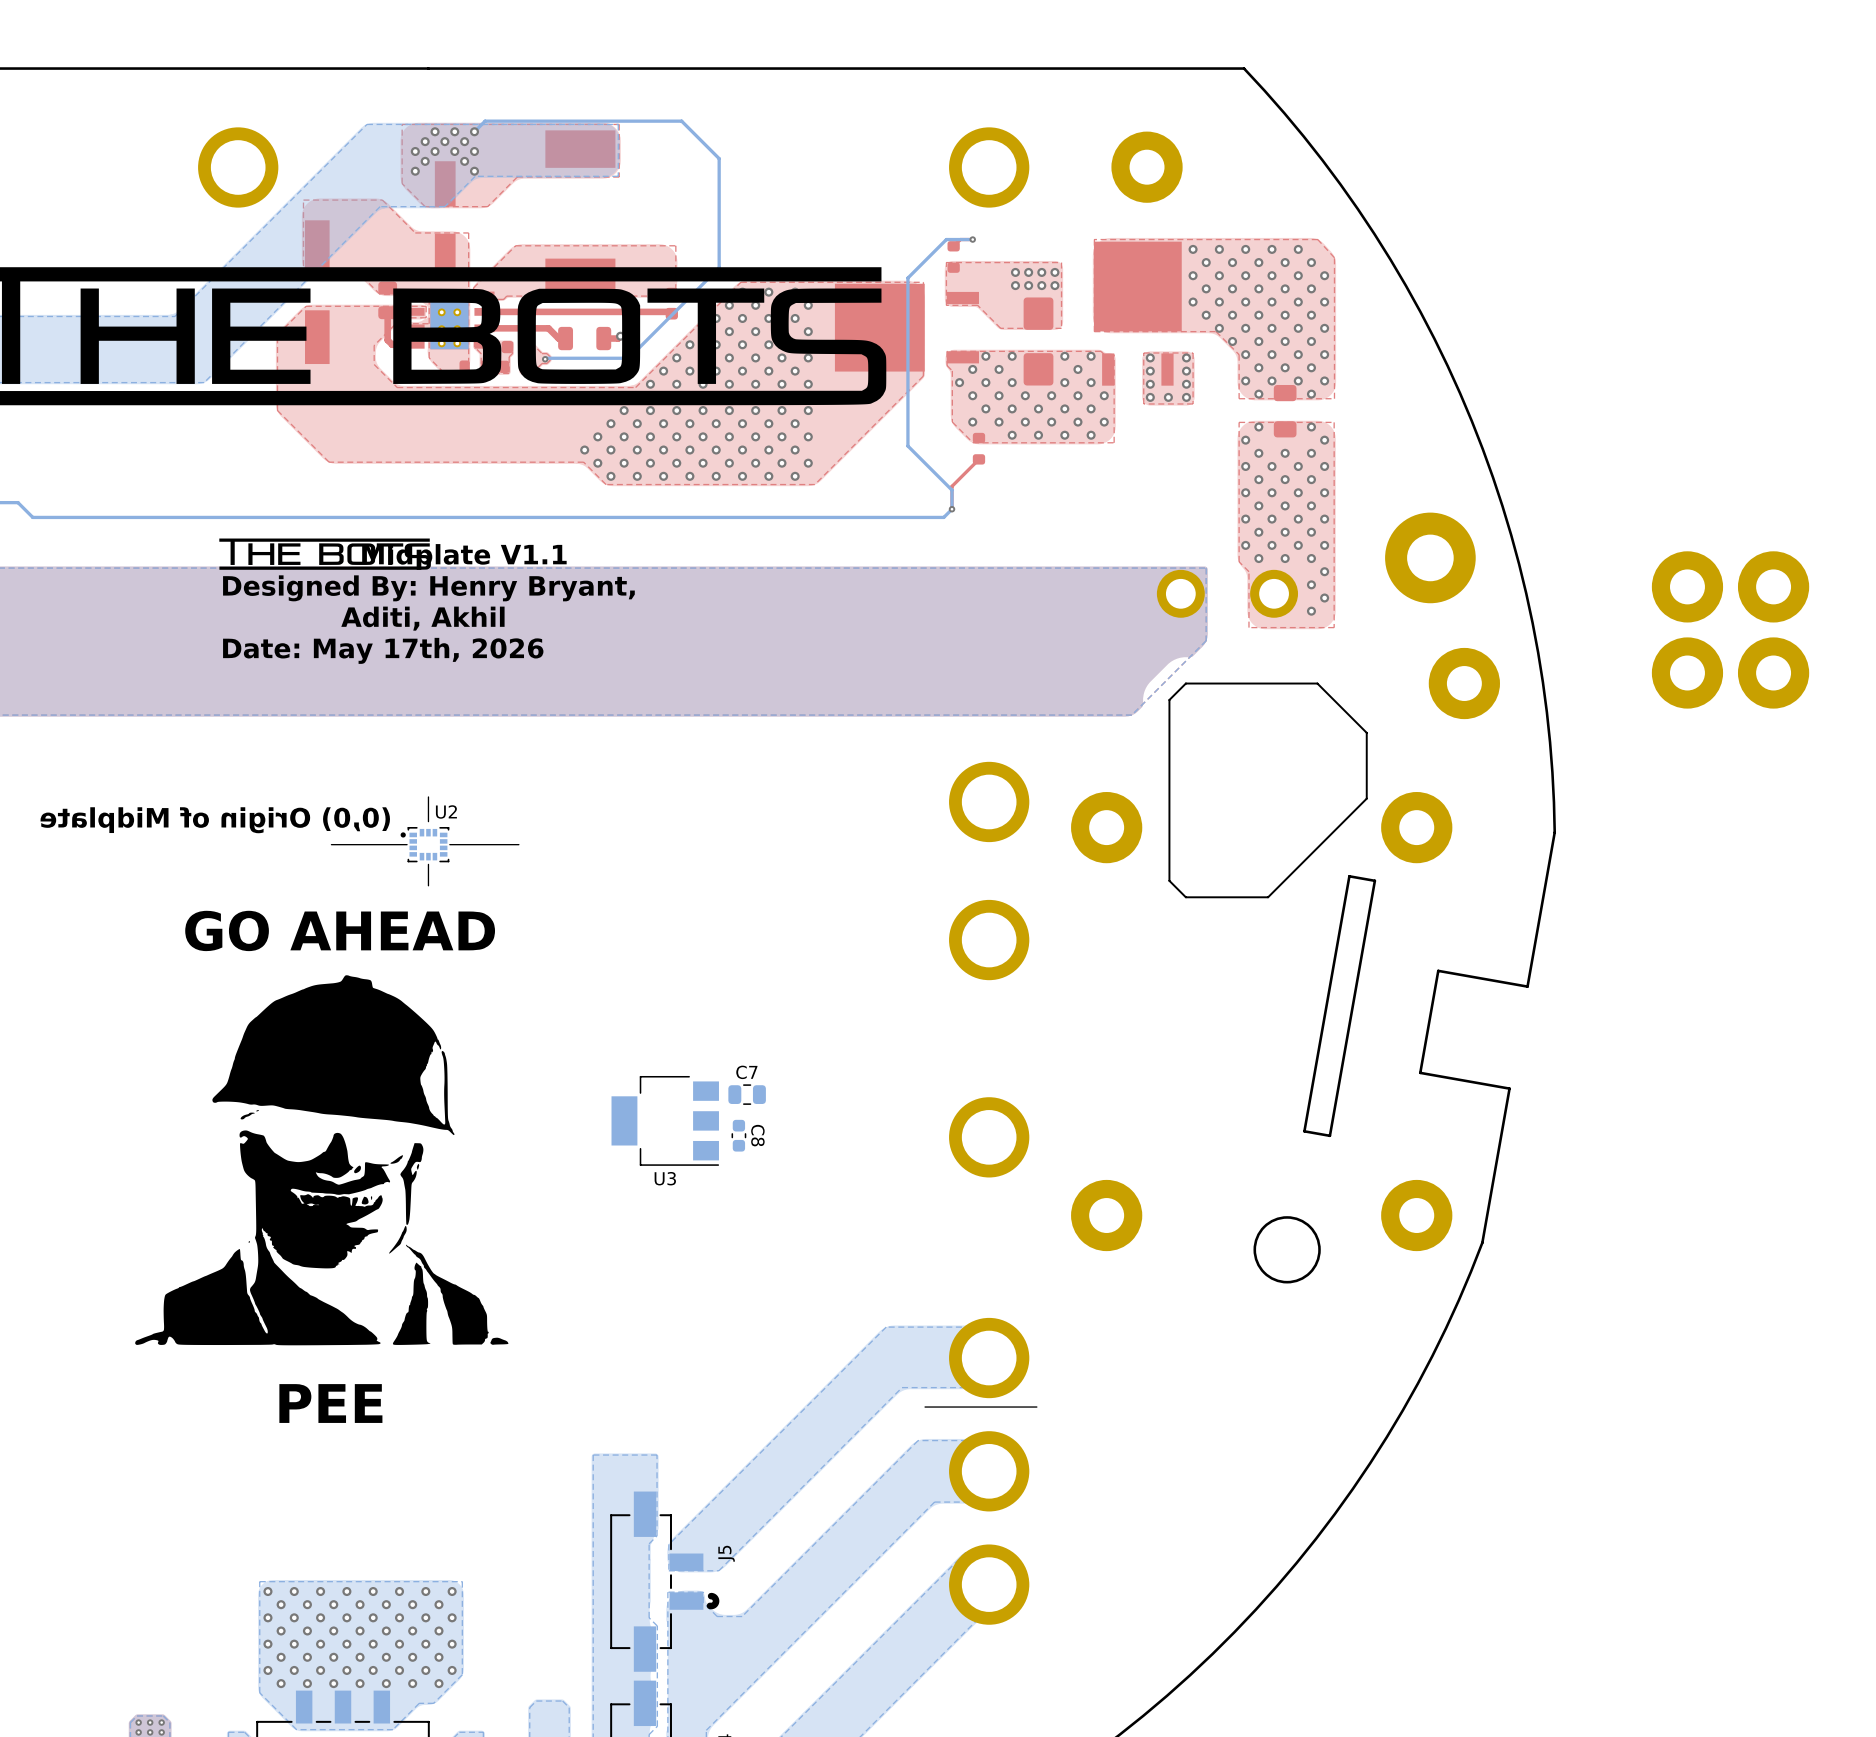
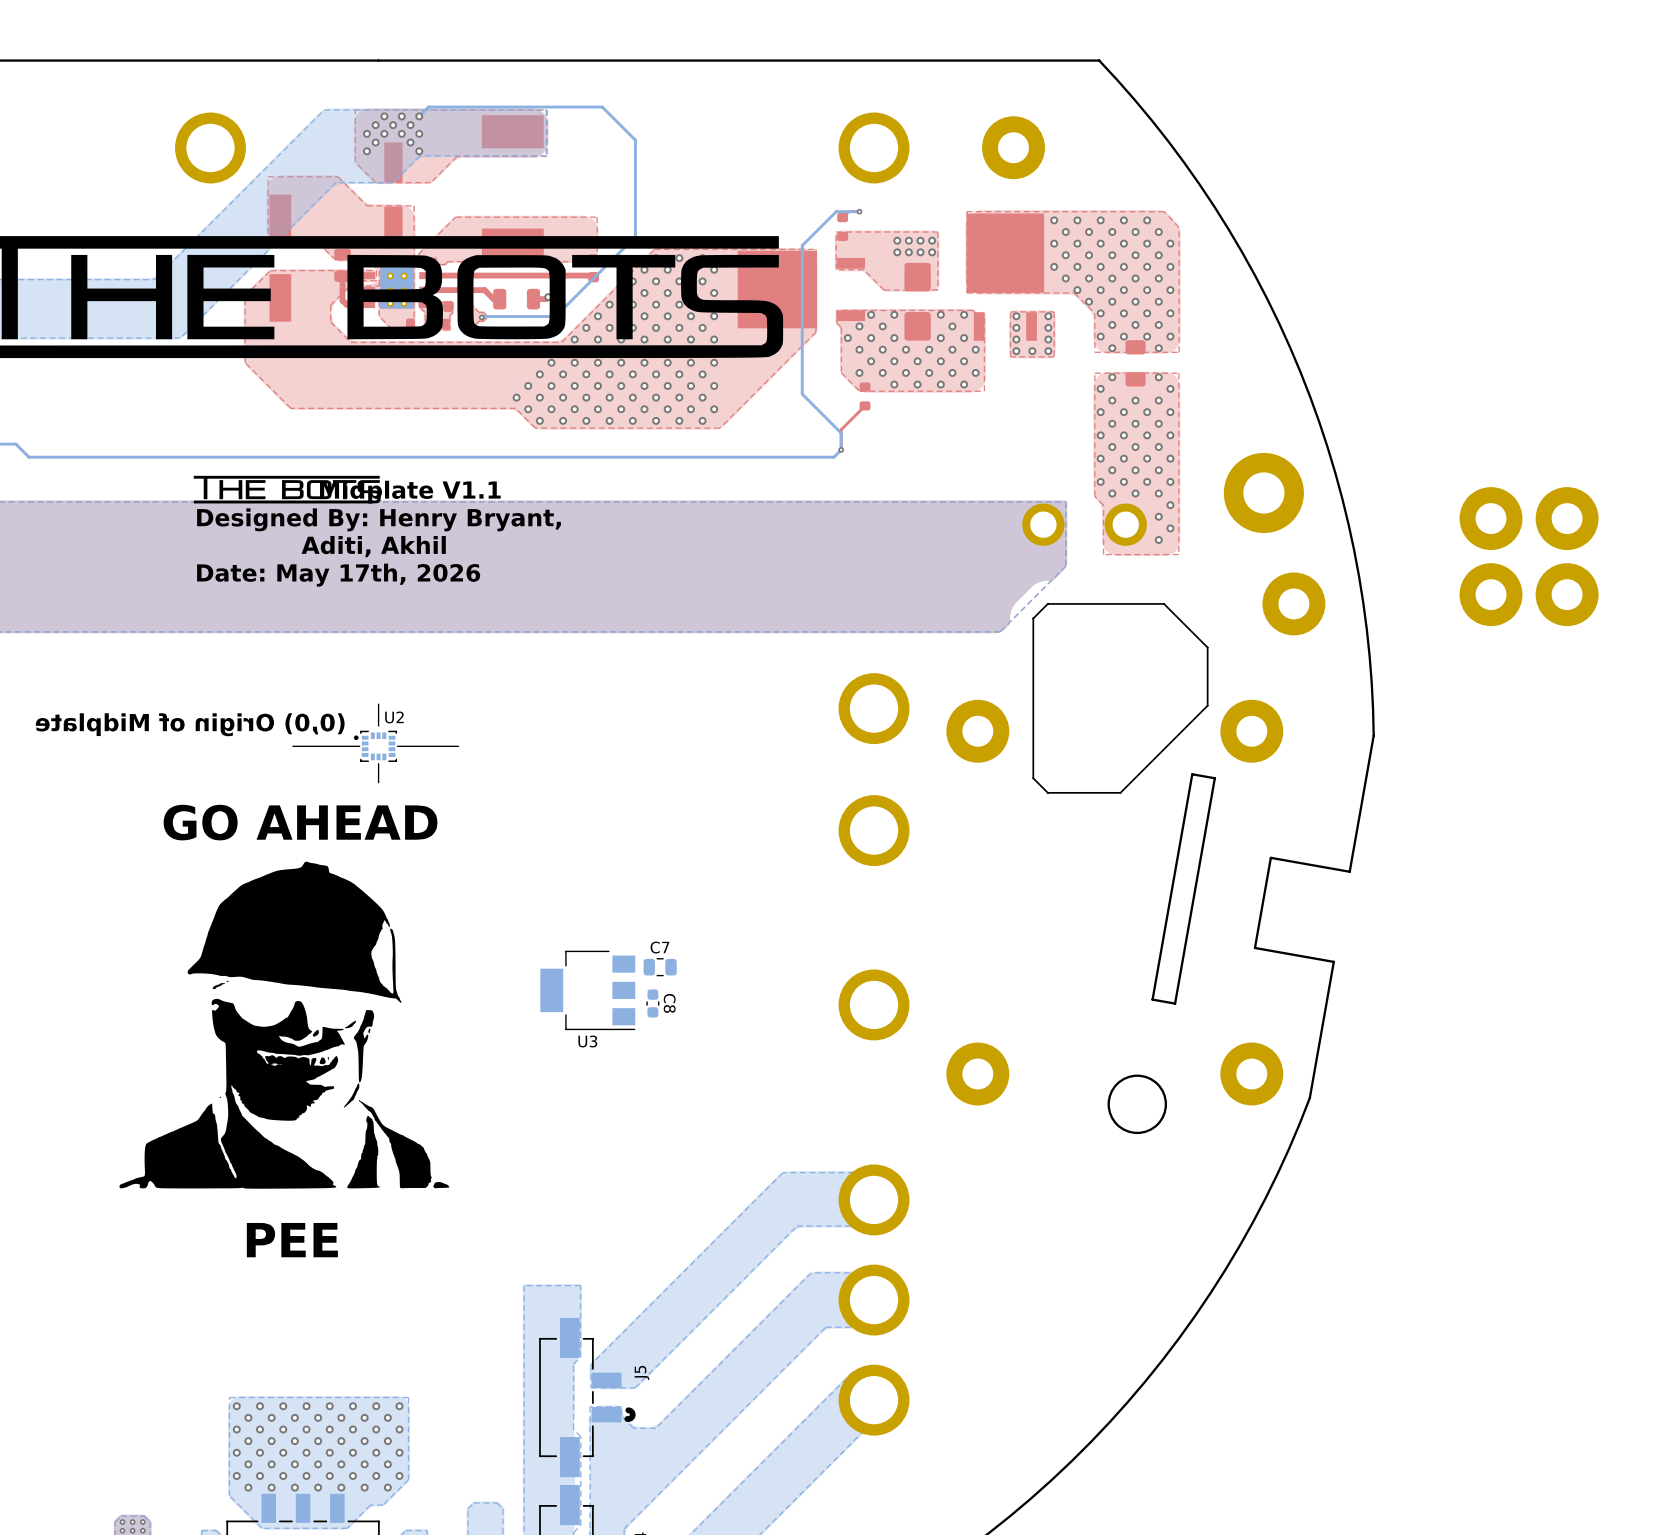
board edge: (1036, 1407) (925, 1407) -> none

